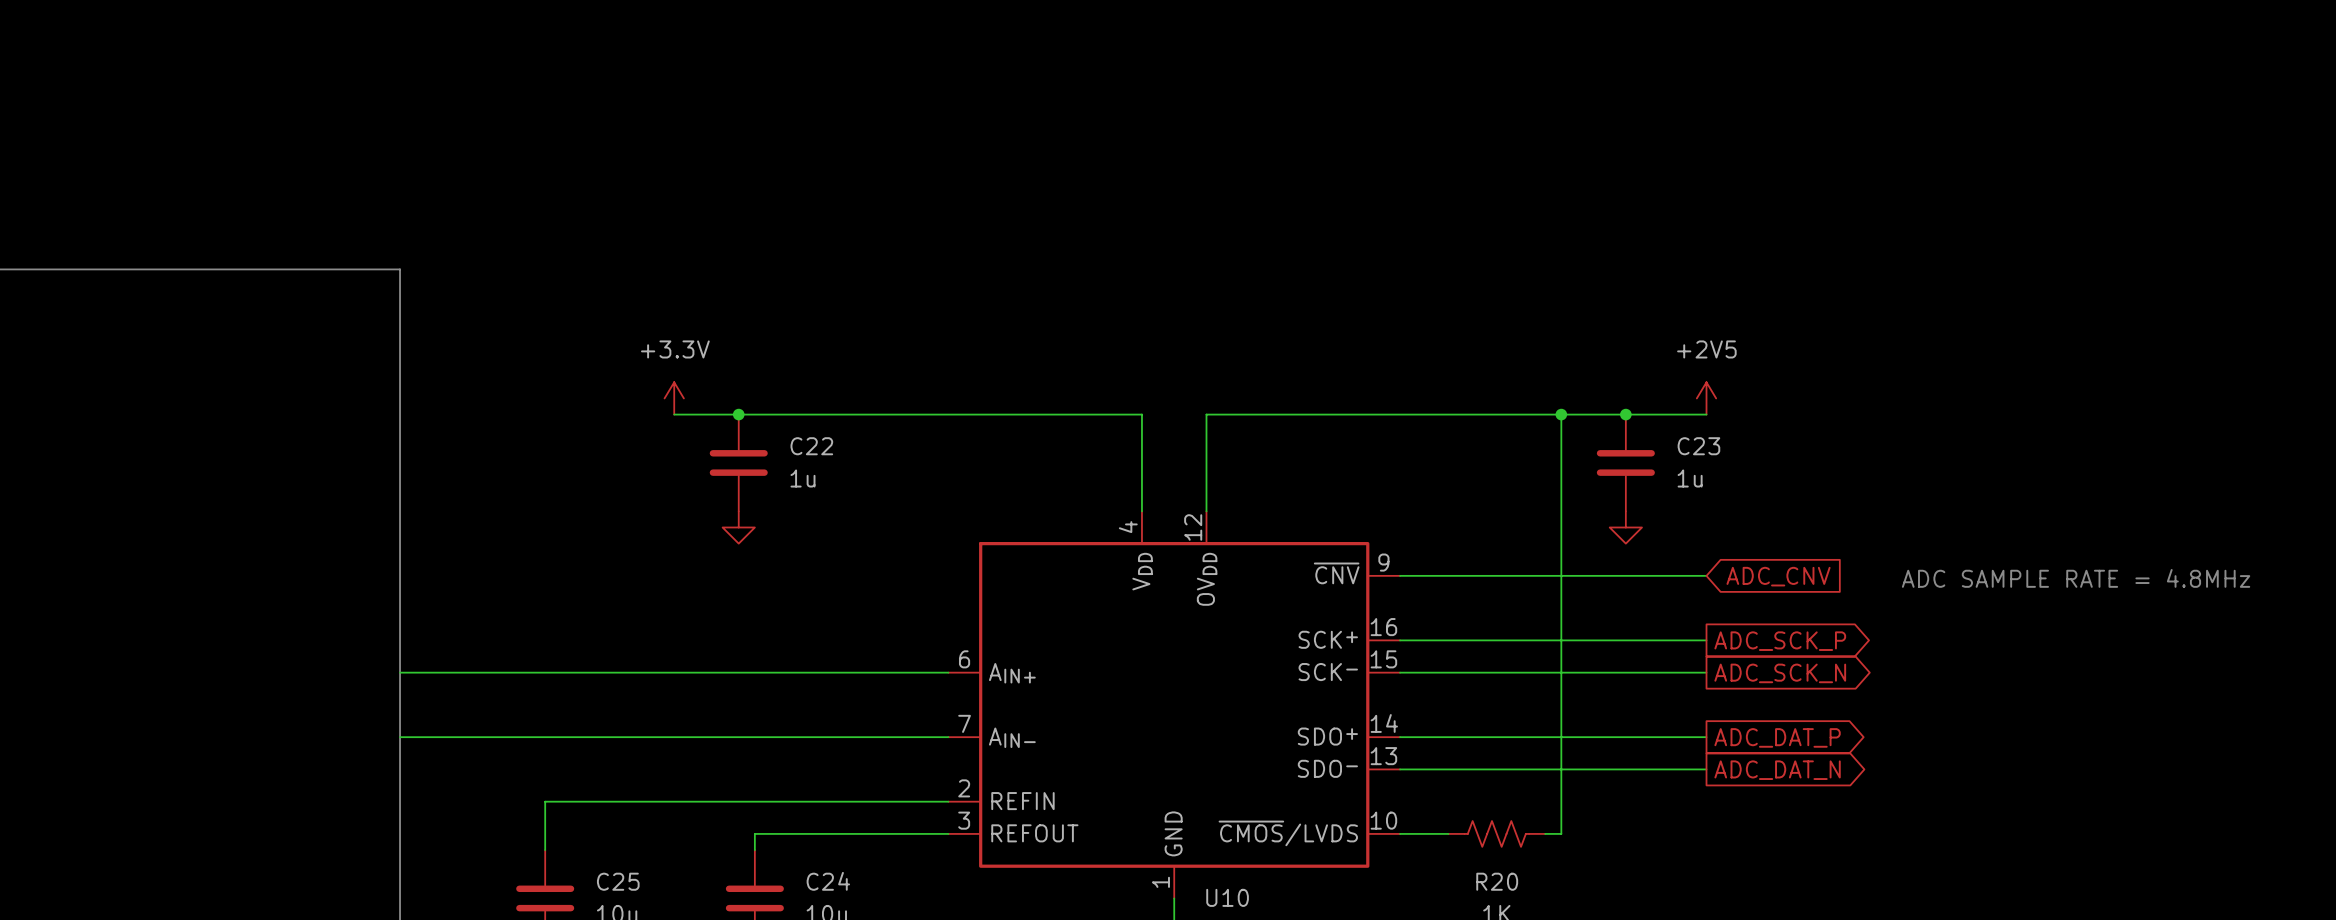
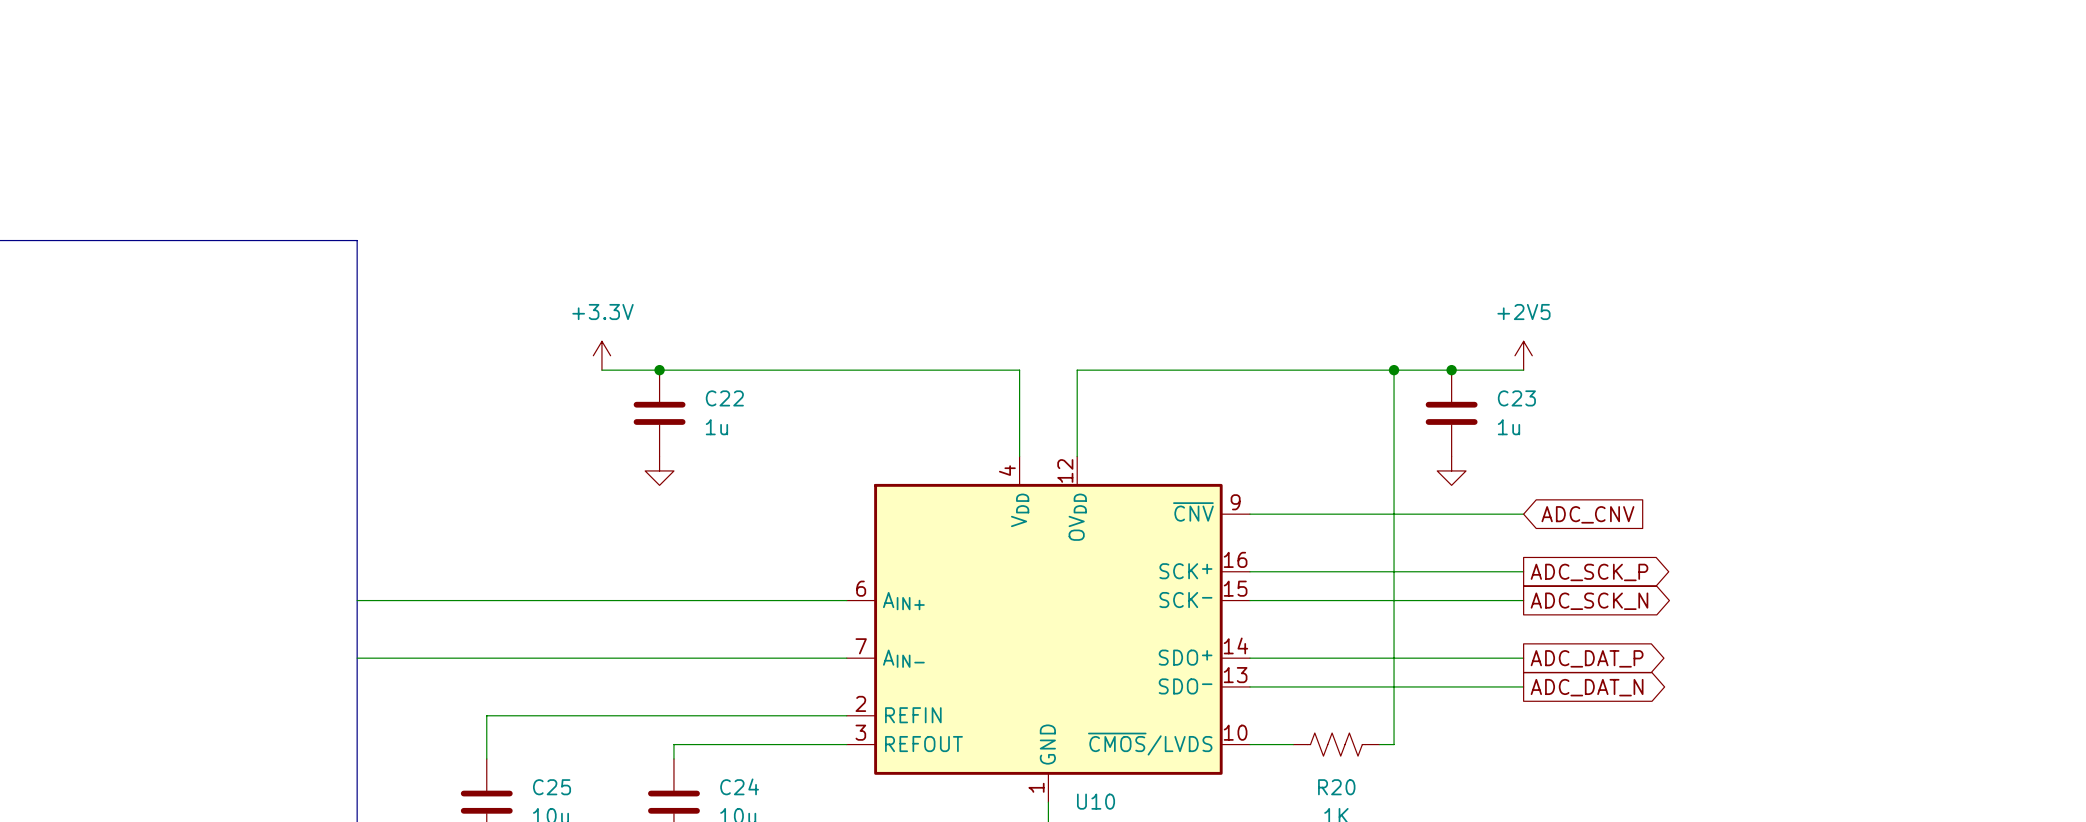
text: ADC SAMPLE RATE = 4.8MHz (2076, 578) -> none

